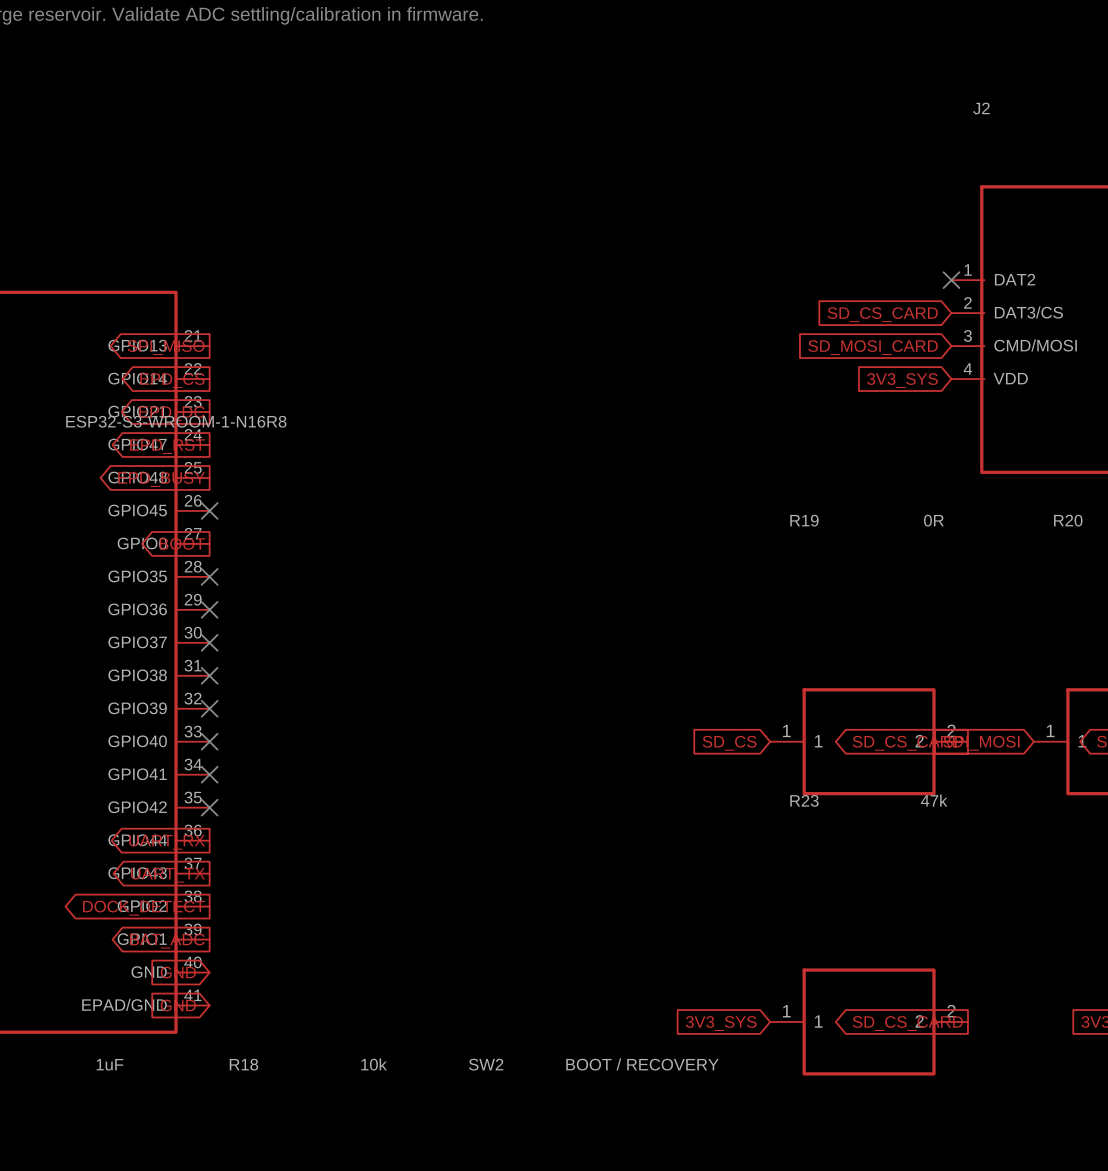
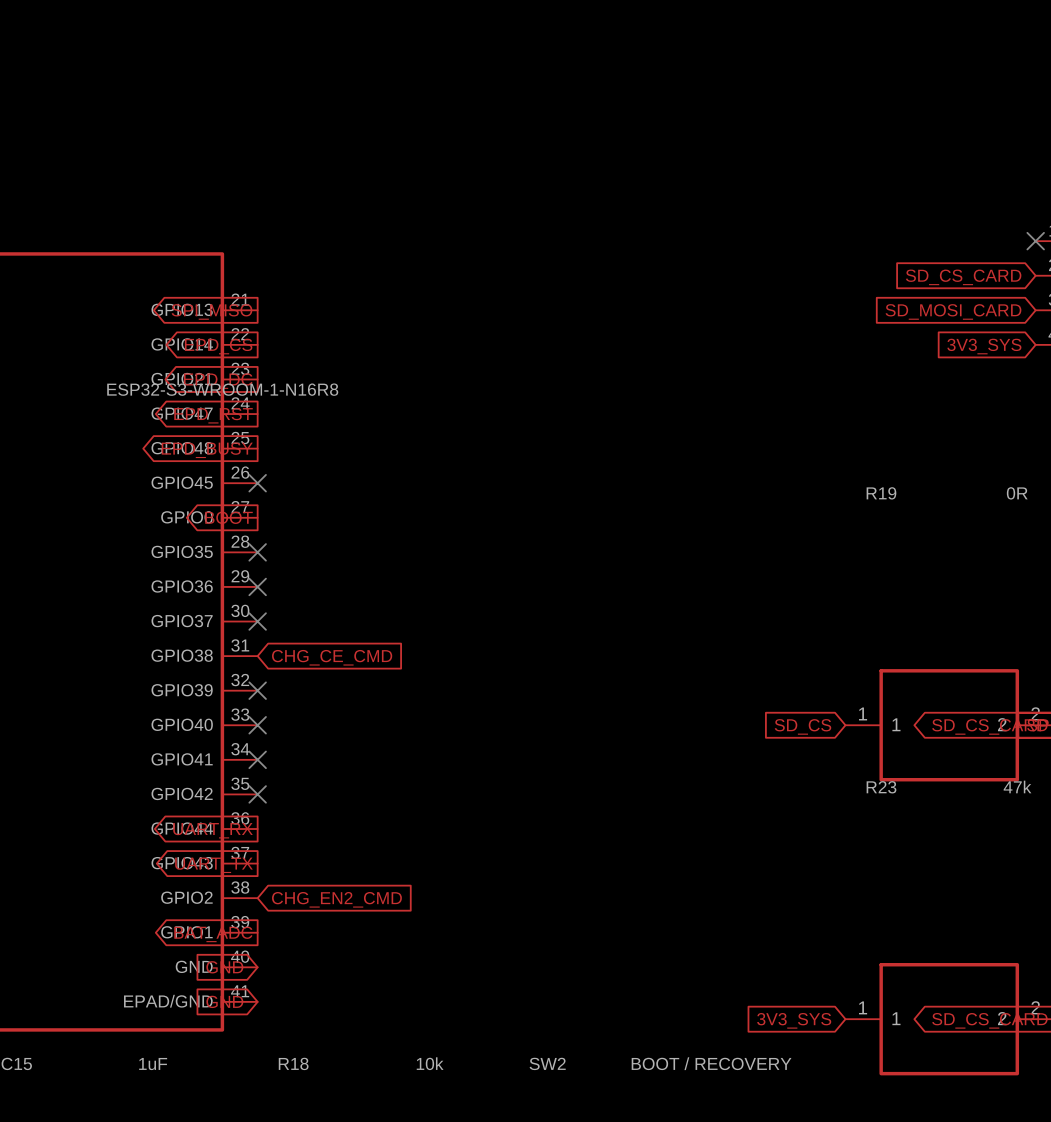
no-connect mark: (209, 675) -> none
global label: none -> CHG_CE_CMD (332, 657)
global label shape: output (144, 908) -> input (336, 899)
global label: DOCK_DETECT (144, 908) -> CHG_EN2_CMD (336, 899)

